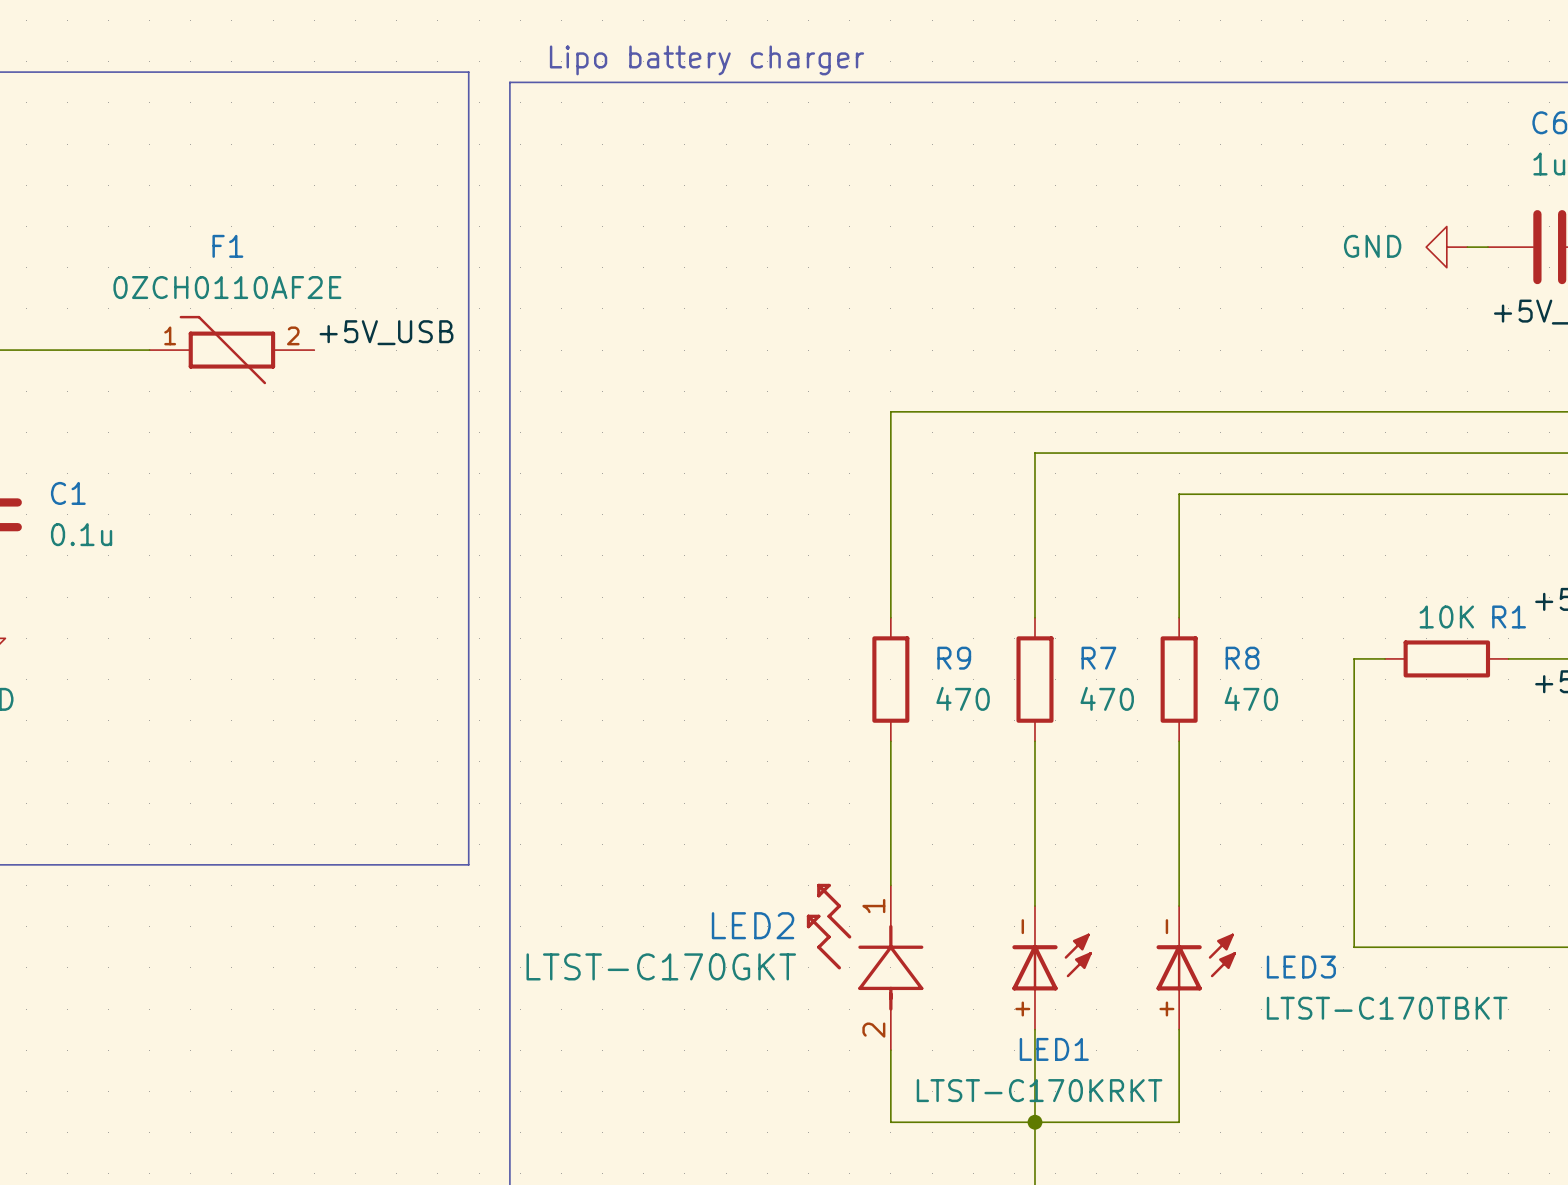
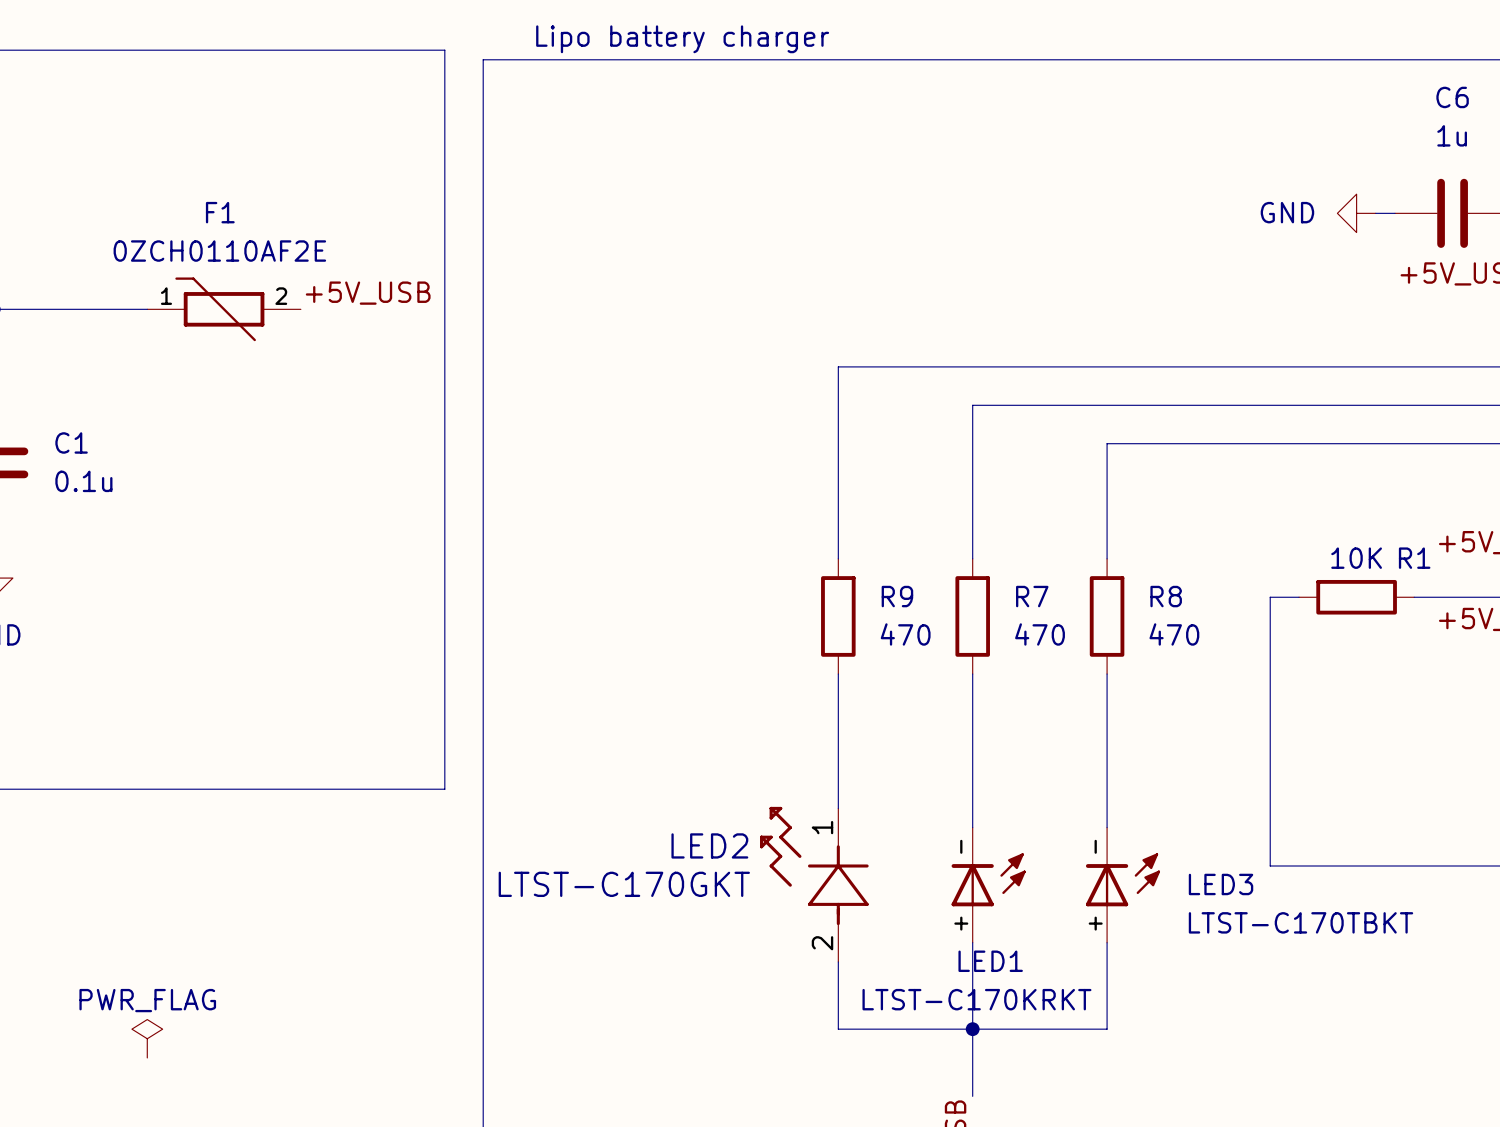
text position: Lipo battery charger (707, 60) -> Lipo battery charger (682, 39)
power symbol: none -> PWR_FLAG (147, 1038)

